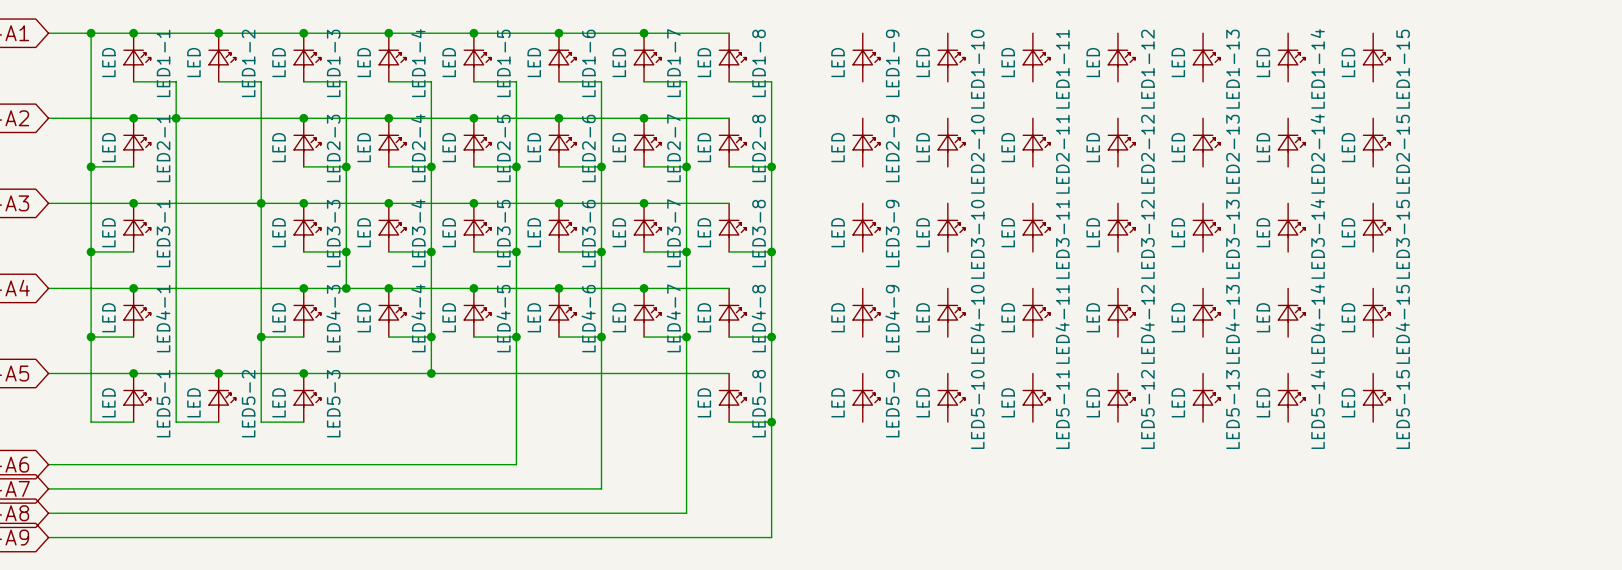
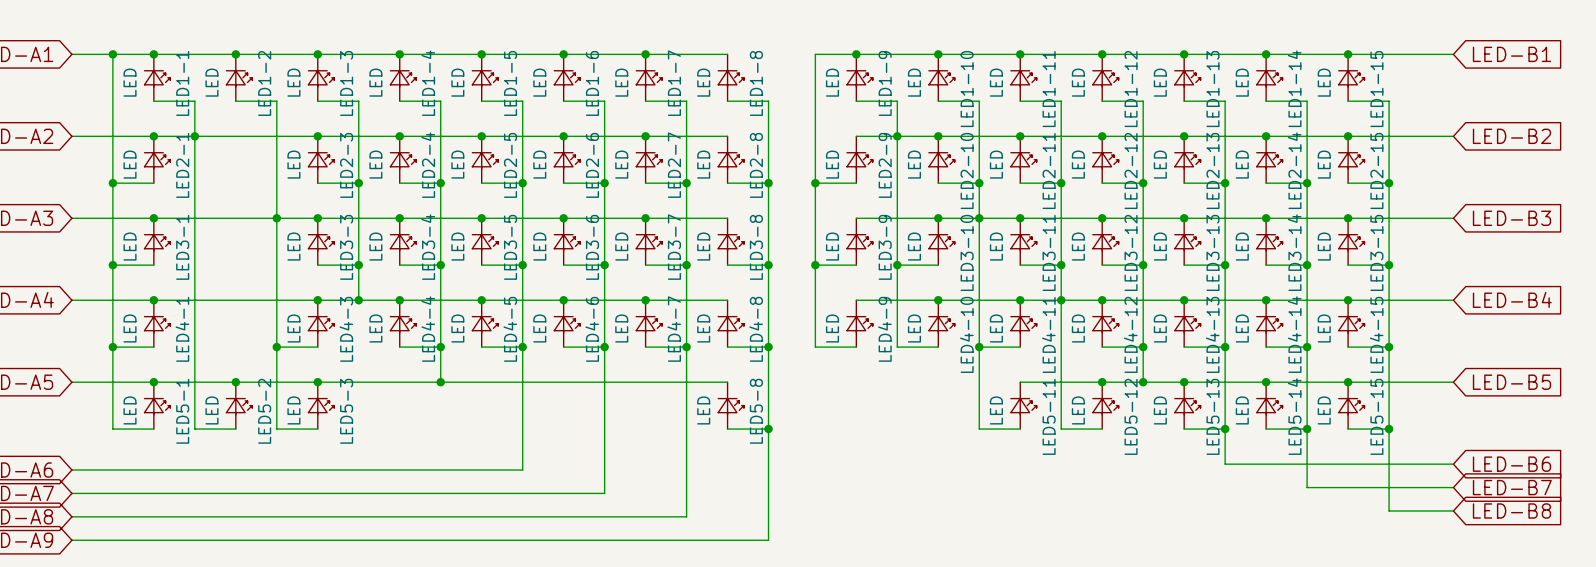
junction: none -> (856, 54)
junction: none -> (938, 54)
junction: none -> (1020, 54)
junction: none -> (1102, 54)
junction: none -> (1184, 54)
junction: none -> (1266, 54)
junction: none -> (1348, 54)
wire: none -> (1453, 54) (815, 54) (815, 347) (856, 347)
global label: none -> LED-B1 (1511, 54)
wire: none -> (856, 101) (897, 101) (897, 347) (938, 347)
wire: none -> (938, 101) (979, 101) (979, 429) (1020, 429)
wire: none -> (1020, 101) (1061, 101) (1061, 429) (1102, 429)
wire: none -> (1102, 101) (1143, 101) (1143, 382)
wire: none -> (1184, 101) (1225, 101) (1225, 464) (1453, 464)
wire: none -> (1266, 101) (1307, 101) (1307, 487) (1453, 487)
wire: none -> (1348, 101) (1389, 101) (1389, 510) (1453, 510)
wire: none -> (856, 136) (1453, 136)
junction: none -> (897, 136)
junction: none -> (938, 136)
junction: none -> (1020, 136)
junction: none -> (1102, 136)
junction: none -> (1184, 136)
junction: none -> (1266, 136)
junction: none -> (1348, 136)
global label: none -> LED-B2 (1511, 136)
wire: none -> (815, 183) (856, 183)
junction: none -> (815, 183)
wire: none -> (938, 183) (979, 183)
junction: none -> (979, 183)
wire: none -> (1020, 183) (1061, 183)
junction: none -> (1061, 183)
wire: none -> (1102, 183) (1143, 183)
junction: none -> (1143, 183)
wire: none -> (1184, 183) (1225, 183)
junction: none -> (1225, 183)
wire: none -> (1266, 183) (1307, 183)
junction: none -> (1307, 183)
wire: none -> (1348, 183) (1389, 183)
junction: none -> (1389, 183)
wire: none -> (856, 218) (1453, 218)
junction: none -> (938, 218)
junction: none -> (979, 218)
junction: none -> (1020, 218)
junction: none -> (1102, 218)
junction: none -> (1184, 218)
junction: none -> (1266, 218)
junction: none -> (1348, 218)
global label: none -> LED-B3 (1511, 218)
wire: none -> (815, 265) (856, 265)
junction: none -> (815, 265)
wire: none -> (897, 265) (938, 265)
junction: none -> (897, 265)
wire: none -> (1020, 265) (1061, 265)
junction: none -> (1061, 265)
wire: none -> (1102, 265) (1143, 265)
junction: none -> (1143, 265)
wire: none -> (1184, 265) (1225, 265)
junction: none -> (1225, 265)
wire: none -> (1266, 265) (1307, 265)
junction: none -> (1307, 265)
wire: none -> (1348, 265) (1389, 265)
junction: none -> (1389, 265)
wire: none -> (856, 300) (1453, 300)
junction: none -> (938, 300)
junction: none -> (1020, 300)
junction: none -> (1061, 300)
junction: none -> (1102, 300)
junction: none -> (1184, 300)
junction: none -> (1266, 300)
junction: none -> (1348, 300)
global label: none -> LED-B4 (1512, 299)
wire: none -> (979, 347) (1020, 347)
junction: none -> (979, 347)
wire: none -> (1102, 347) (1143, 347)
junction: none -> (1143, 347)
wire: none -> (1184, 347) (1225, 347)
junction: none -> (1225, 347)
wire: none -> (1266, 347) (1307, 347)
junction: none -> (1307, 347)
wire: none -> (1348, 347) (1389, 347)
junction: none -> (1389, 347)
wire: none -> (1020, 382) (1453, 382)
junction: none -> (1102, 382)
junction: none -> (1143, 382)
junction: none -> (1184, 382)
junction: none -> (1266, 382)
junction: none -> (1348, 382)
global label: none -> LED-B5 (1511, 382)
LED5-9: LED (866, 397) -> none
LED5-10: LED (951, 397) -> none
wire: none -> (1184, 429) (1225, 429)
junction: none -> (1225, 429)
wire: none -> (1266, 429) (1307, 429)
junction: none -> (1307, 429)
wire: none -> (1348, 429) (1389, 429)
junction: none -> (1389, 429)
global label: none -> LED-B6 (1511, 464)
global label: none -> LED-B7 (1512, 487)
global label: none -> LED-B8 (1511, 510)

